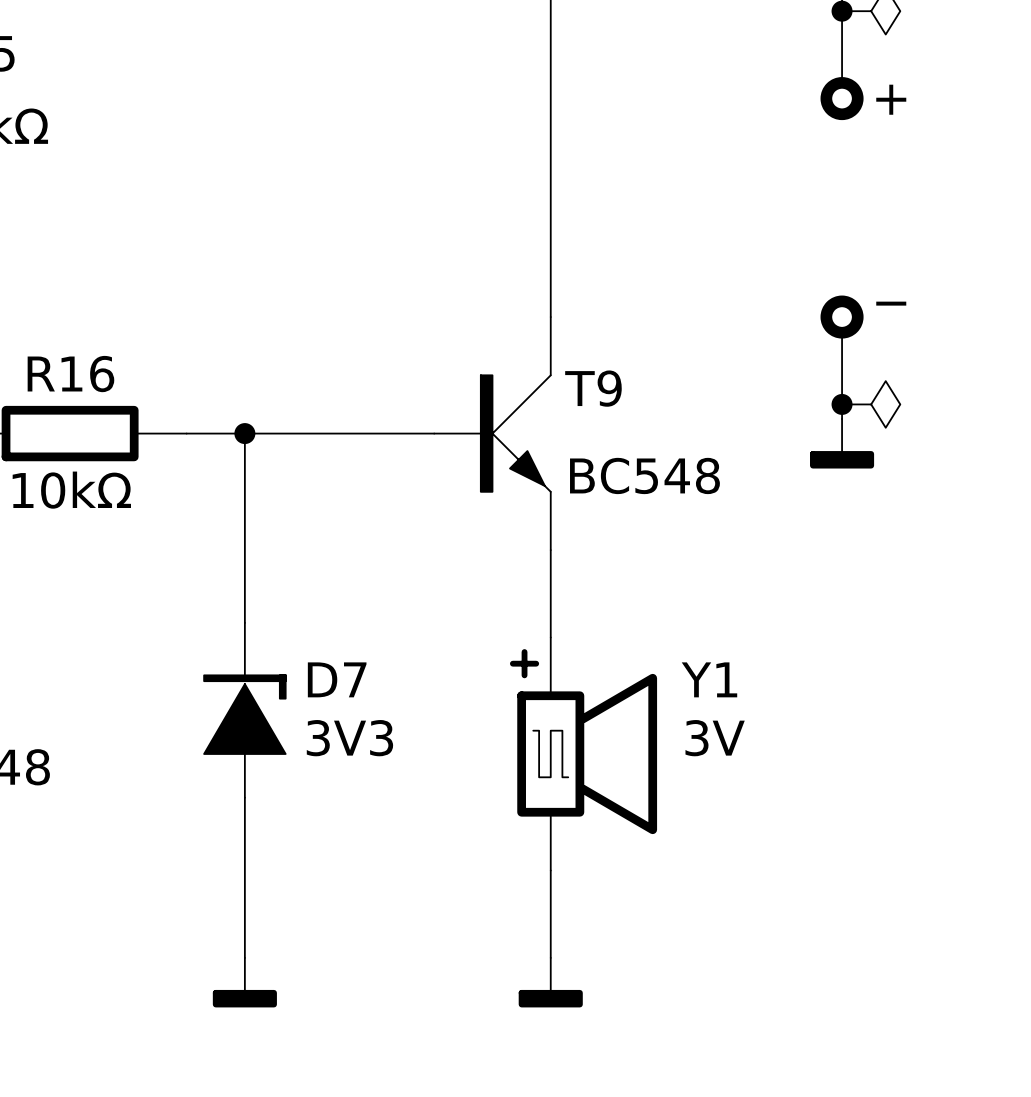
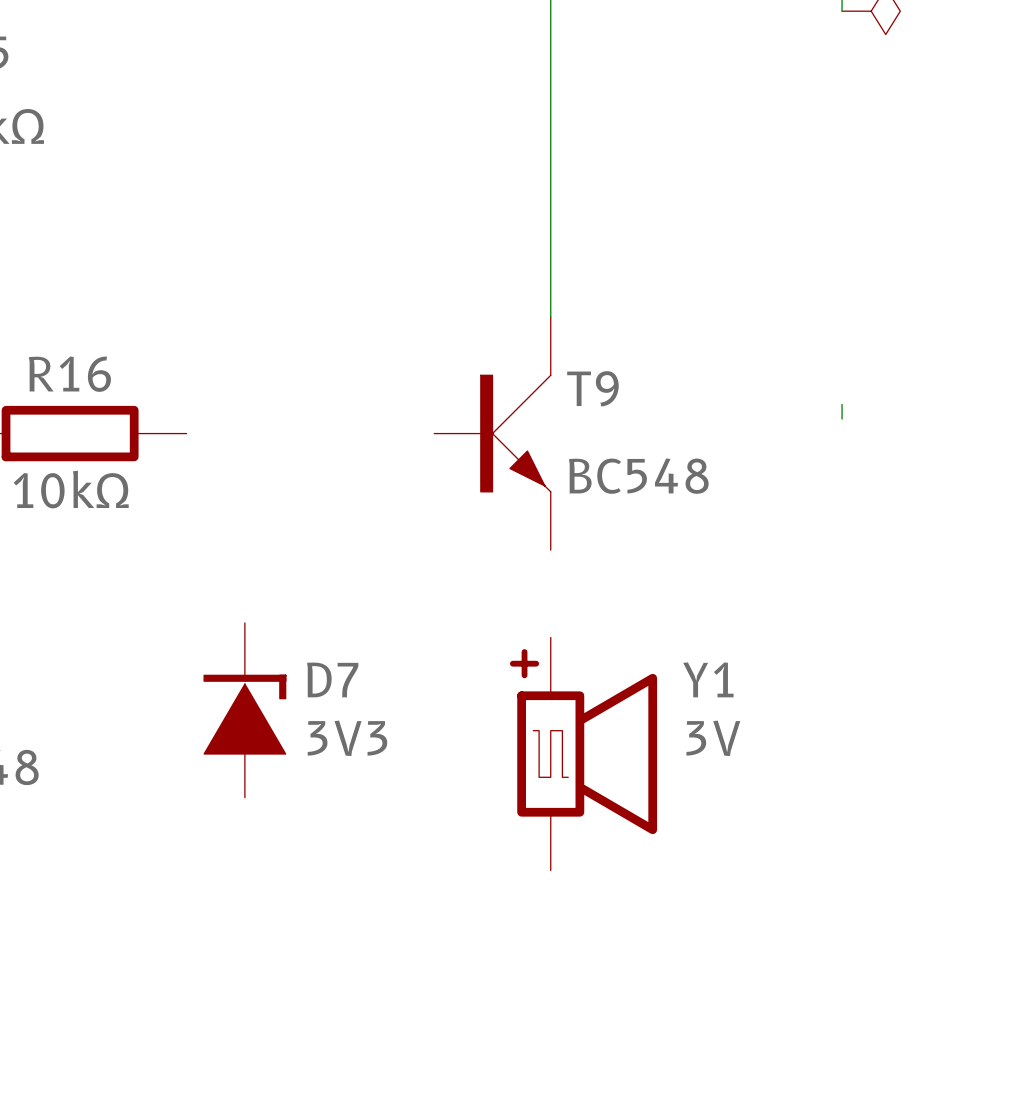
junction: (842, 11) -> none
part: + (842, 65) -> none
part: − (842, 349) -> none
junction: (842, 404) -> none
power symbol: (871, 404) -> none
wire: (186, 433) (434, 433) -> none
wire: (244, 433) (244, 622) -> none
junction: (244, 433) -> none
power symbol: (842, 443) -> none
wire: (550, 550) (550, 637) -> none
wire: (244, 797) (244, 957) -> none
wire: (550, 870) (550, 957) -> none
power symbol: (244, 982) -> none
power symbol: (550, 982) -> none

